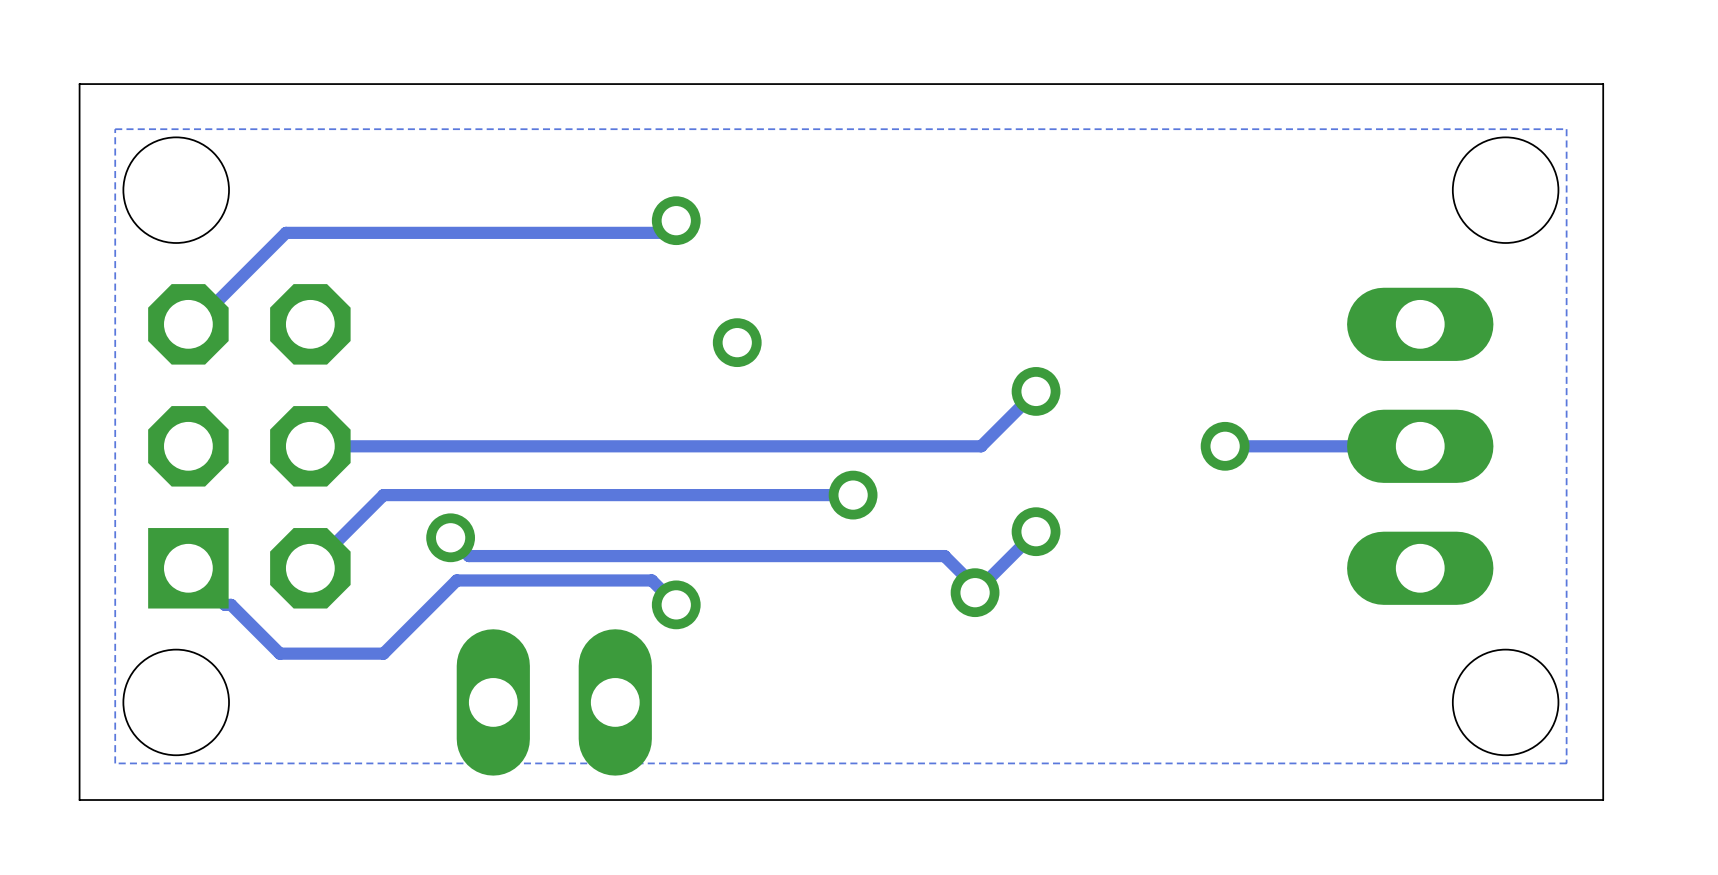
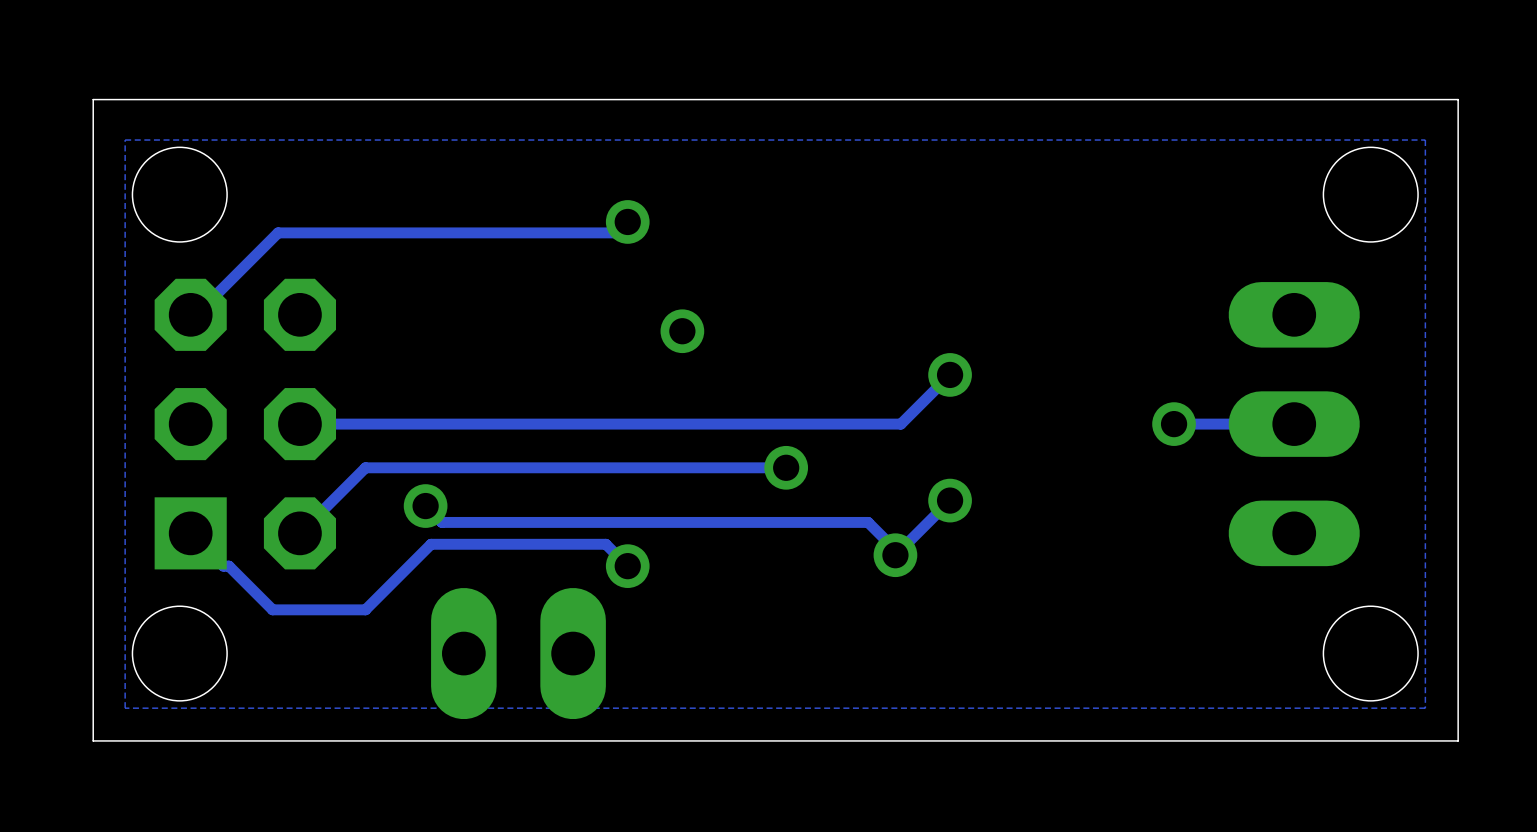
via position: (1225, 446) -> (1174, 424)
track: (1286, 446) (1225, 446) -> none

